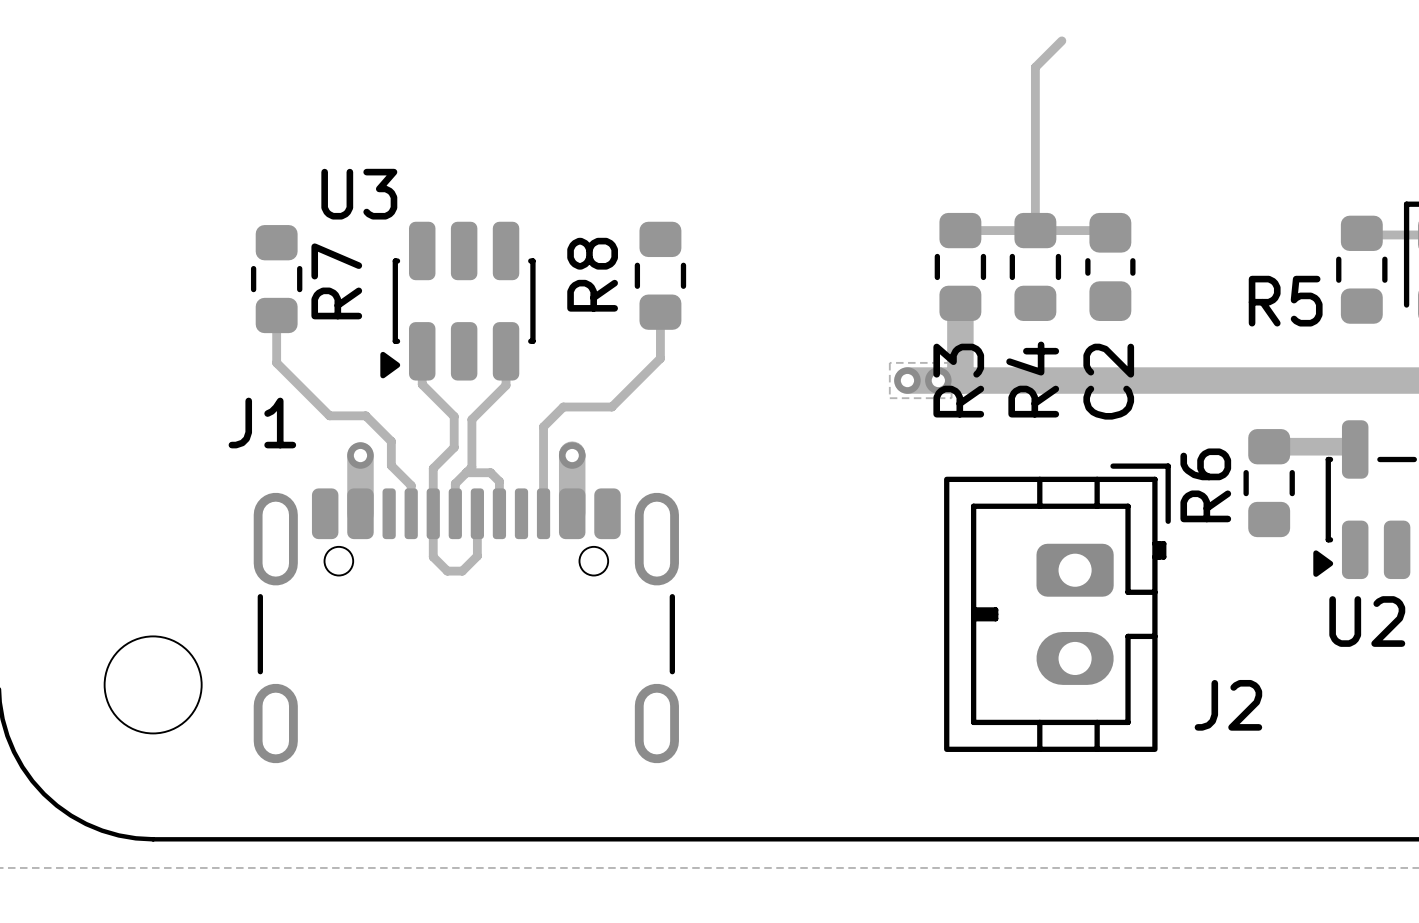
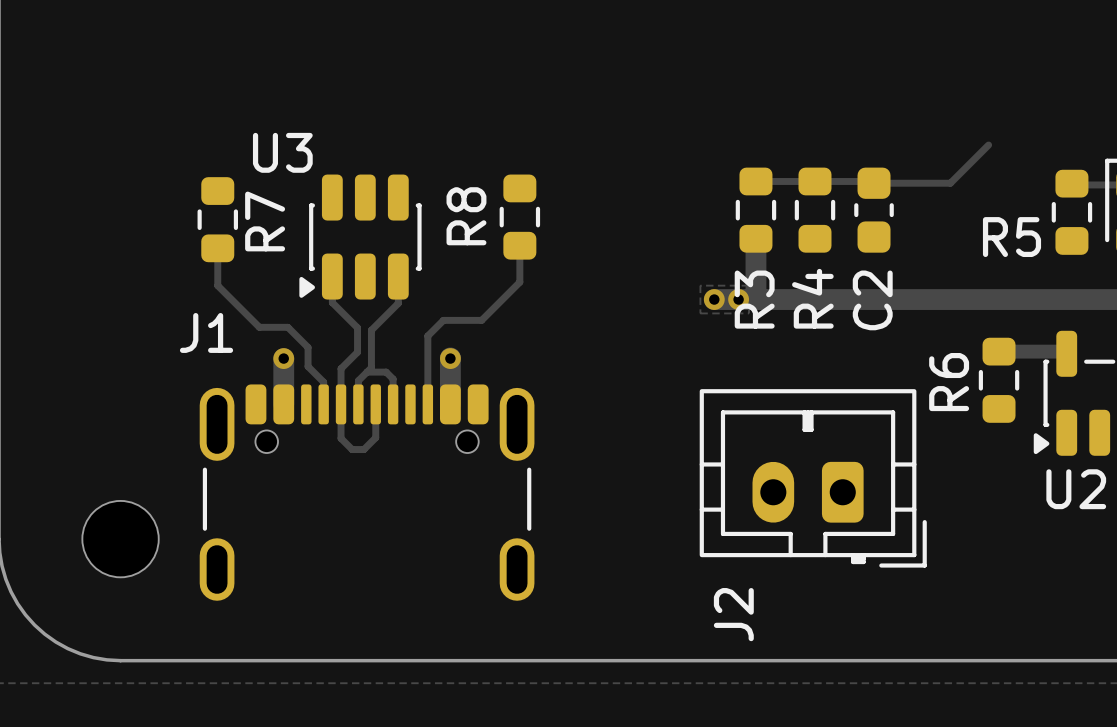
track: (1061, 40) (1035, 67) (1035, 230) -> none
track: none -> (988, 145) (950, 183) (874, 183)
J2 rotation: 0° (1057, 607) -> 90° clockwise (813, 478)

